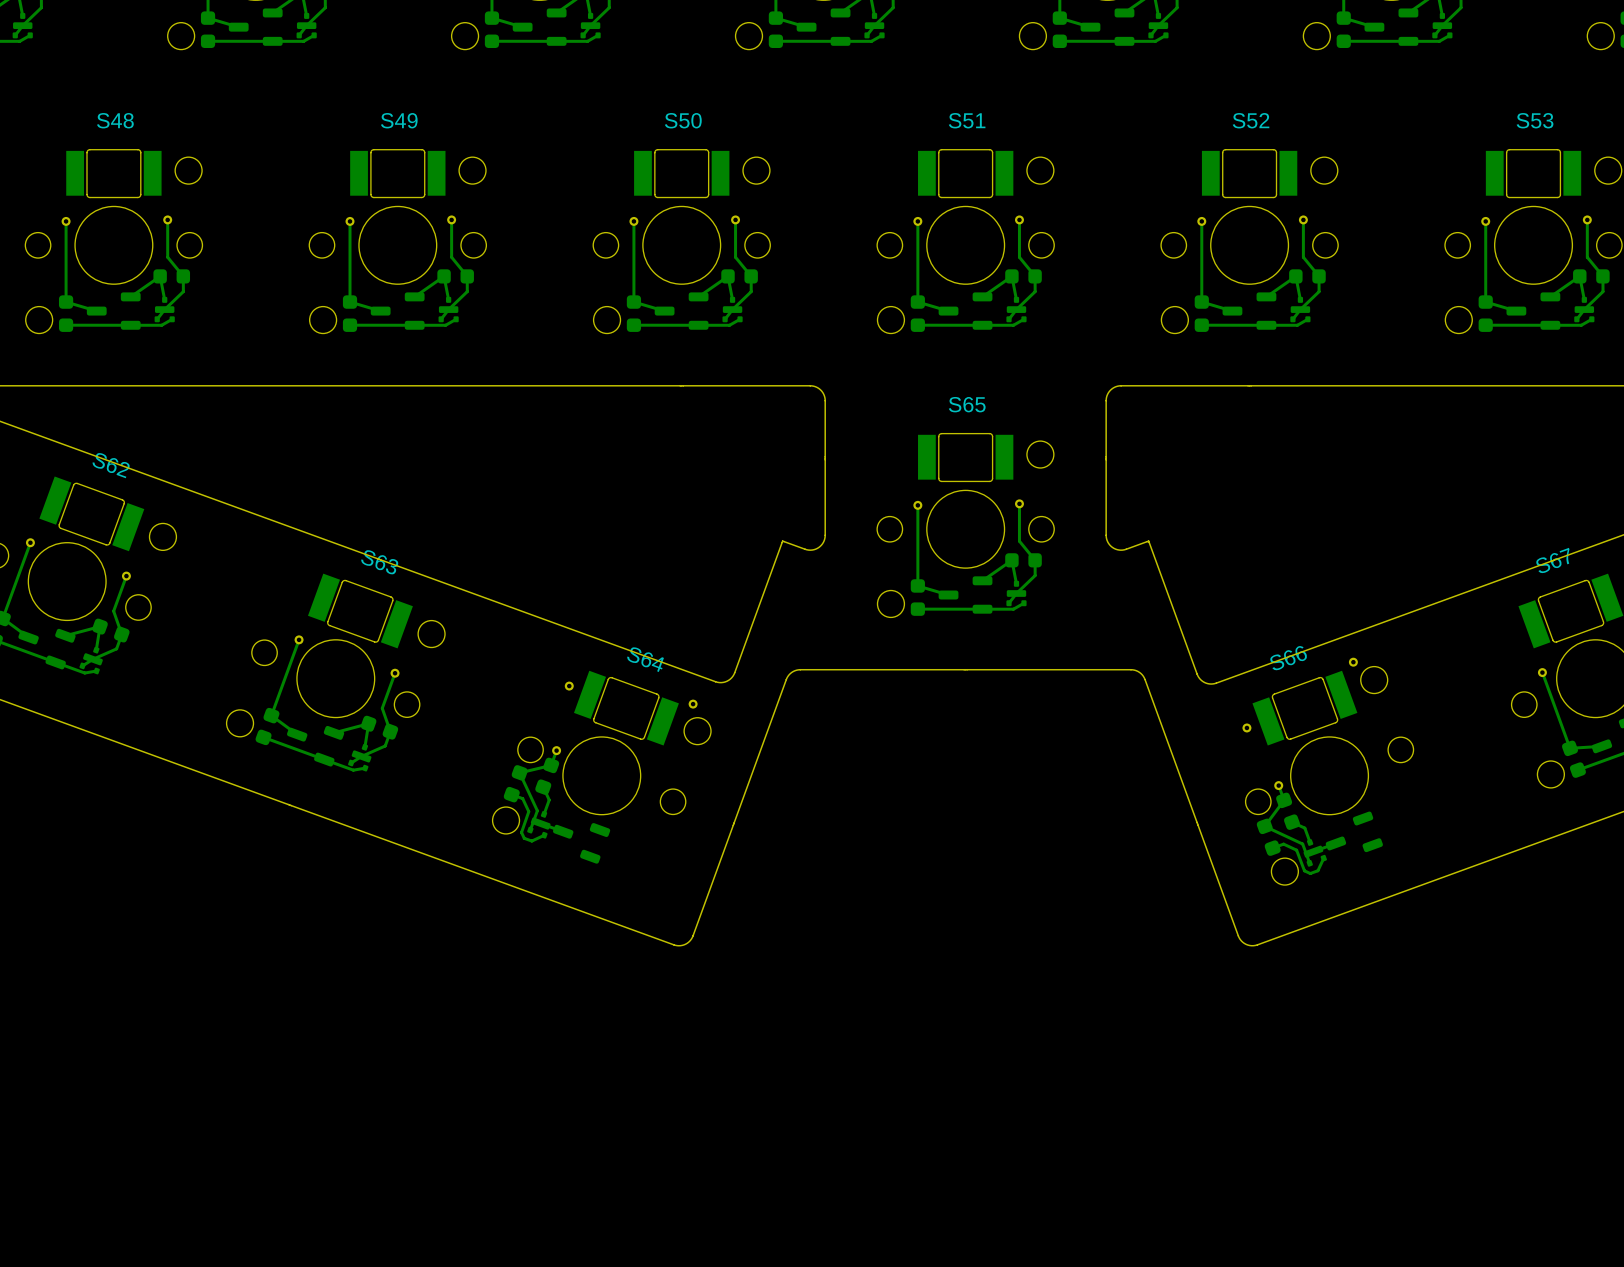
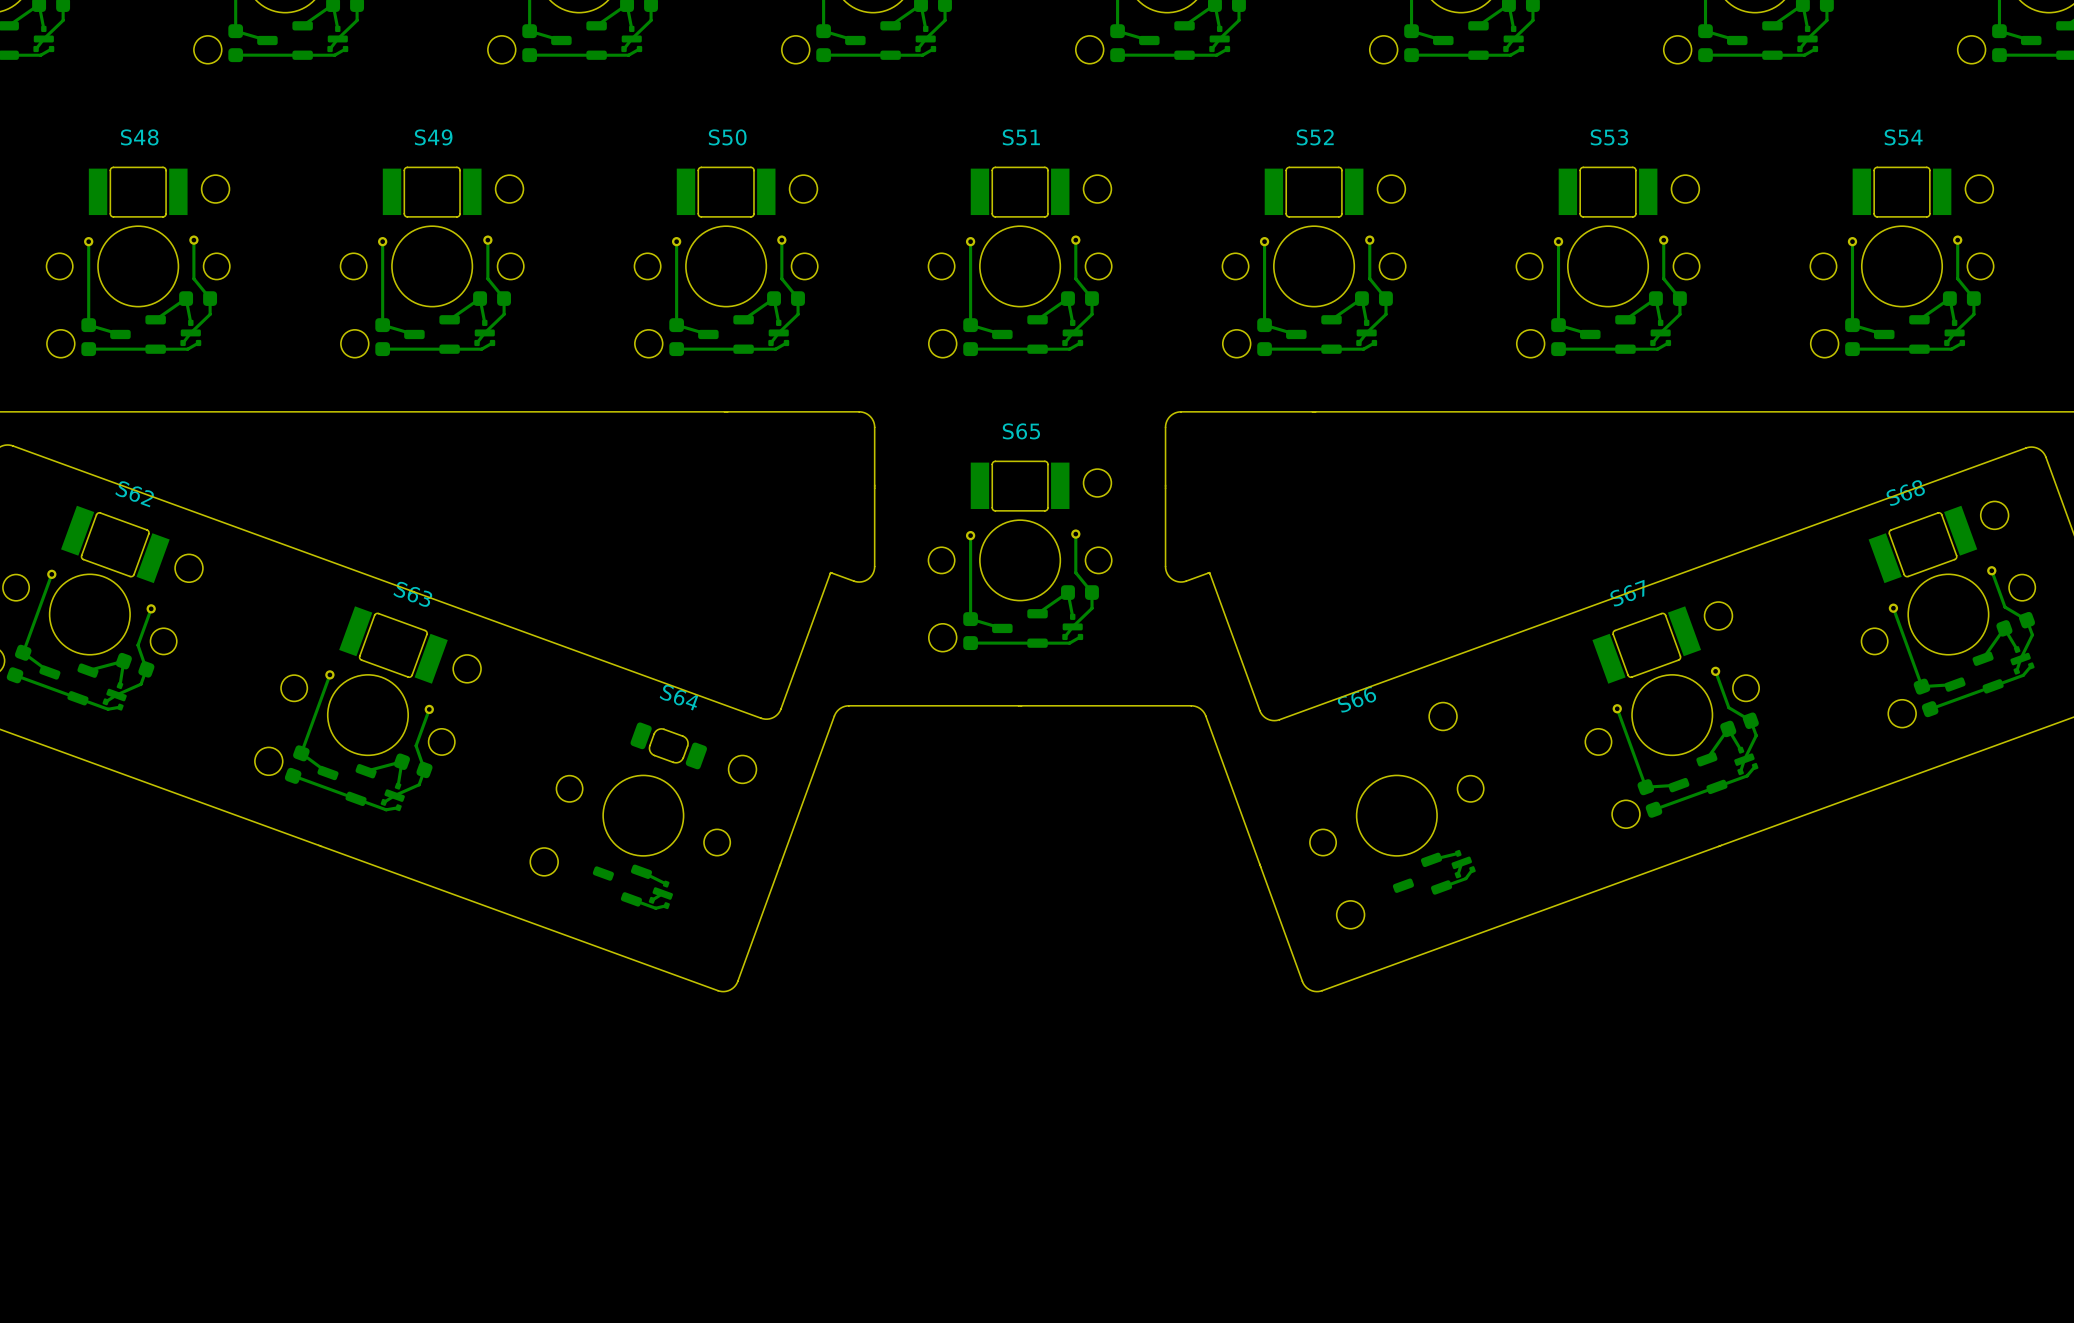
S66 footprint: [1242, 657, 1414, 886] -> [1309, 702, 1485, 930]
S64 footprint: [492, 670, 712, 864] -> [529, 722, 757, 910]

